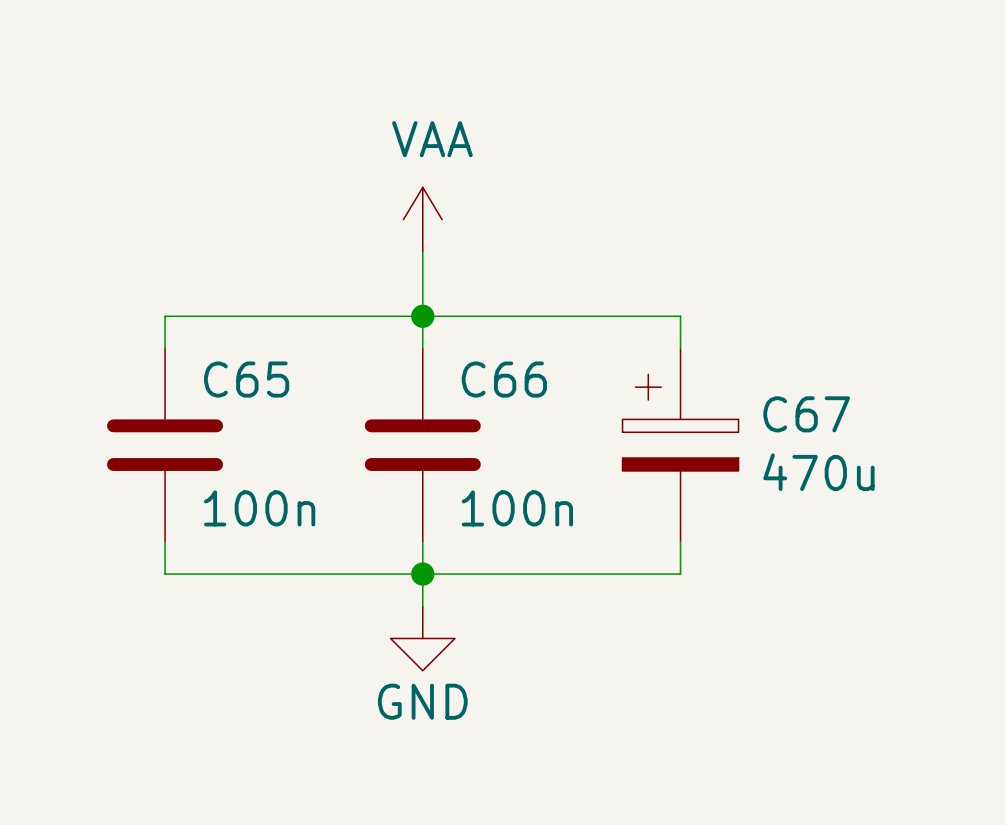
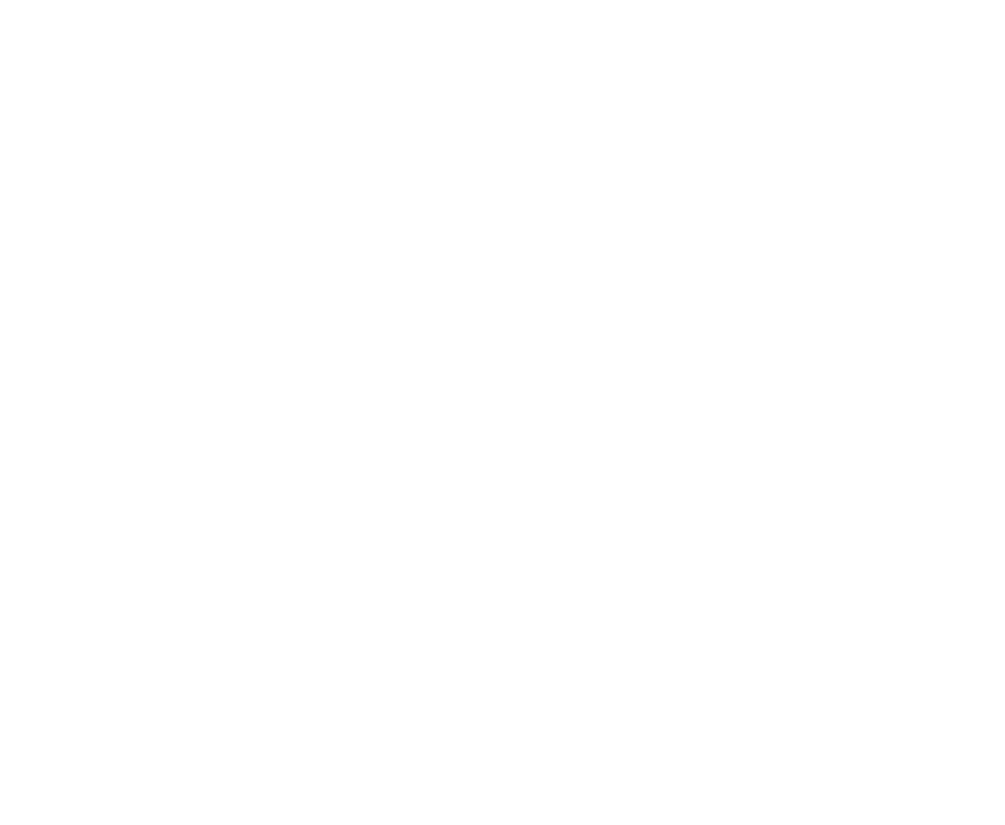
power symbol: VAA (422, 219) -> none
wire: (422, 251) (422, 348) -> none
junction: (422, 316) -> none
wire: (165, 348) (165, 316) (680, 316) (680, 348) -> none
C65: 100n (165, 445) -> none
C66: 100n (422, 445) -> none
C67: 470u (680, 445) -> none
wire: (165, 541) (165, 574) (680, 574) (680, 541) -> none
wire: (422, 541) (422, 606) -> none
junction: (422, 574) -> none
power symbol: GND (422, 638) -> none

